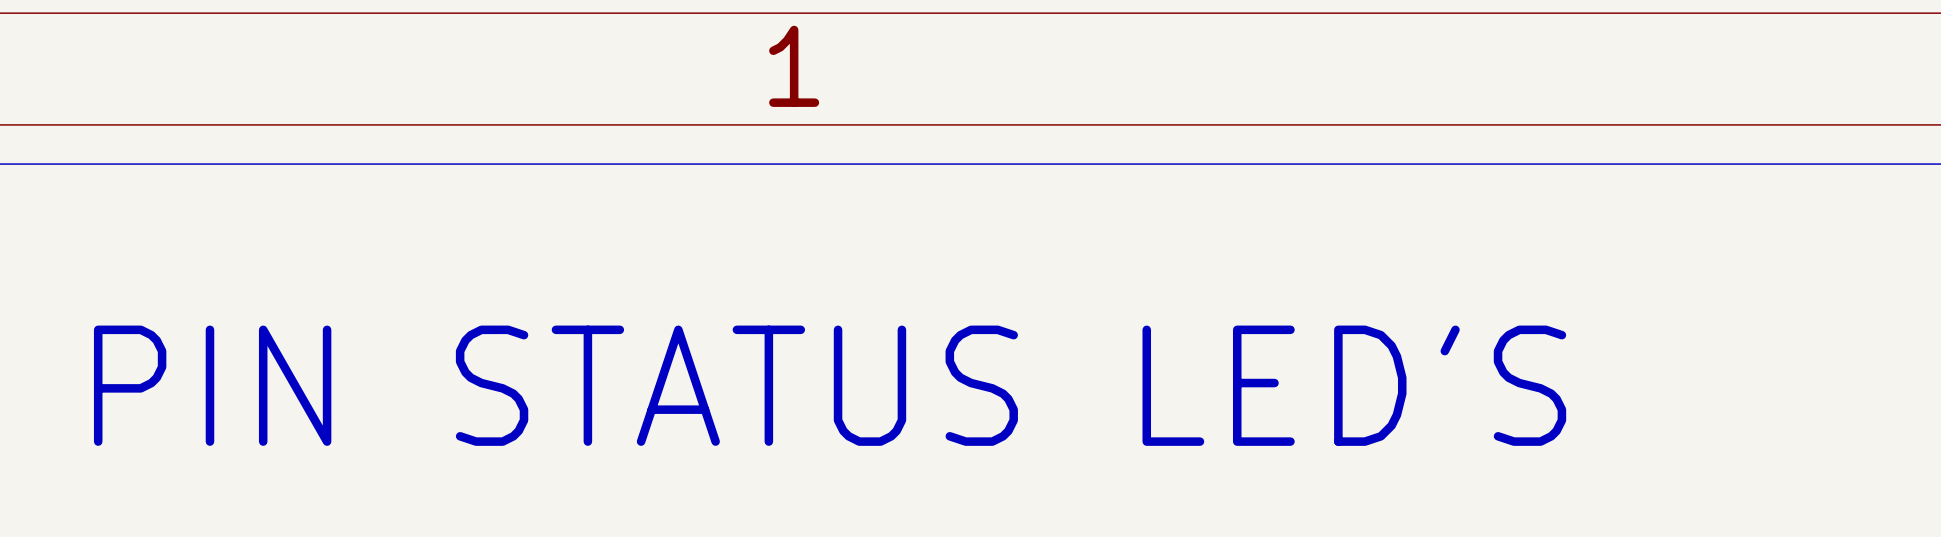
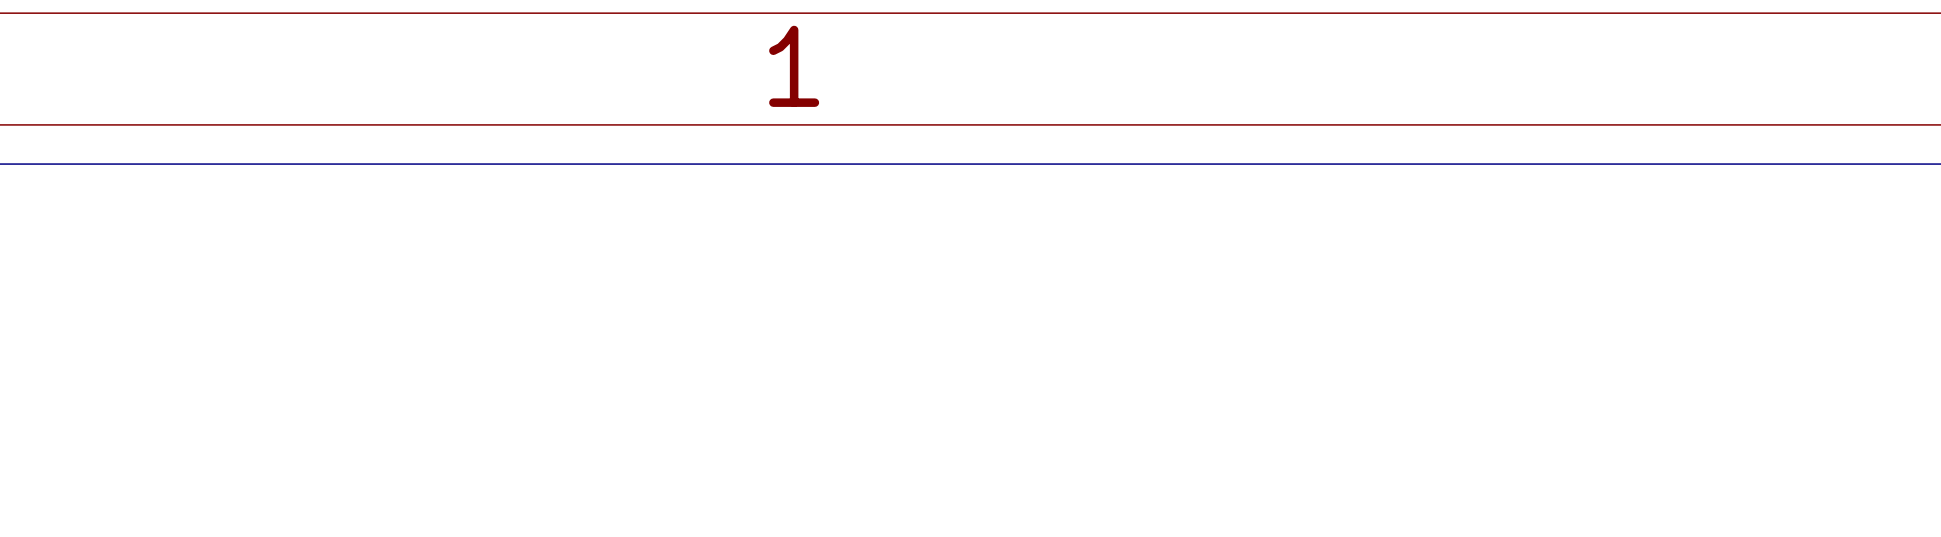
text: PIN STATUS LED'S (830, 385) -> none

